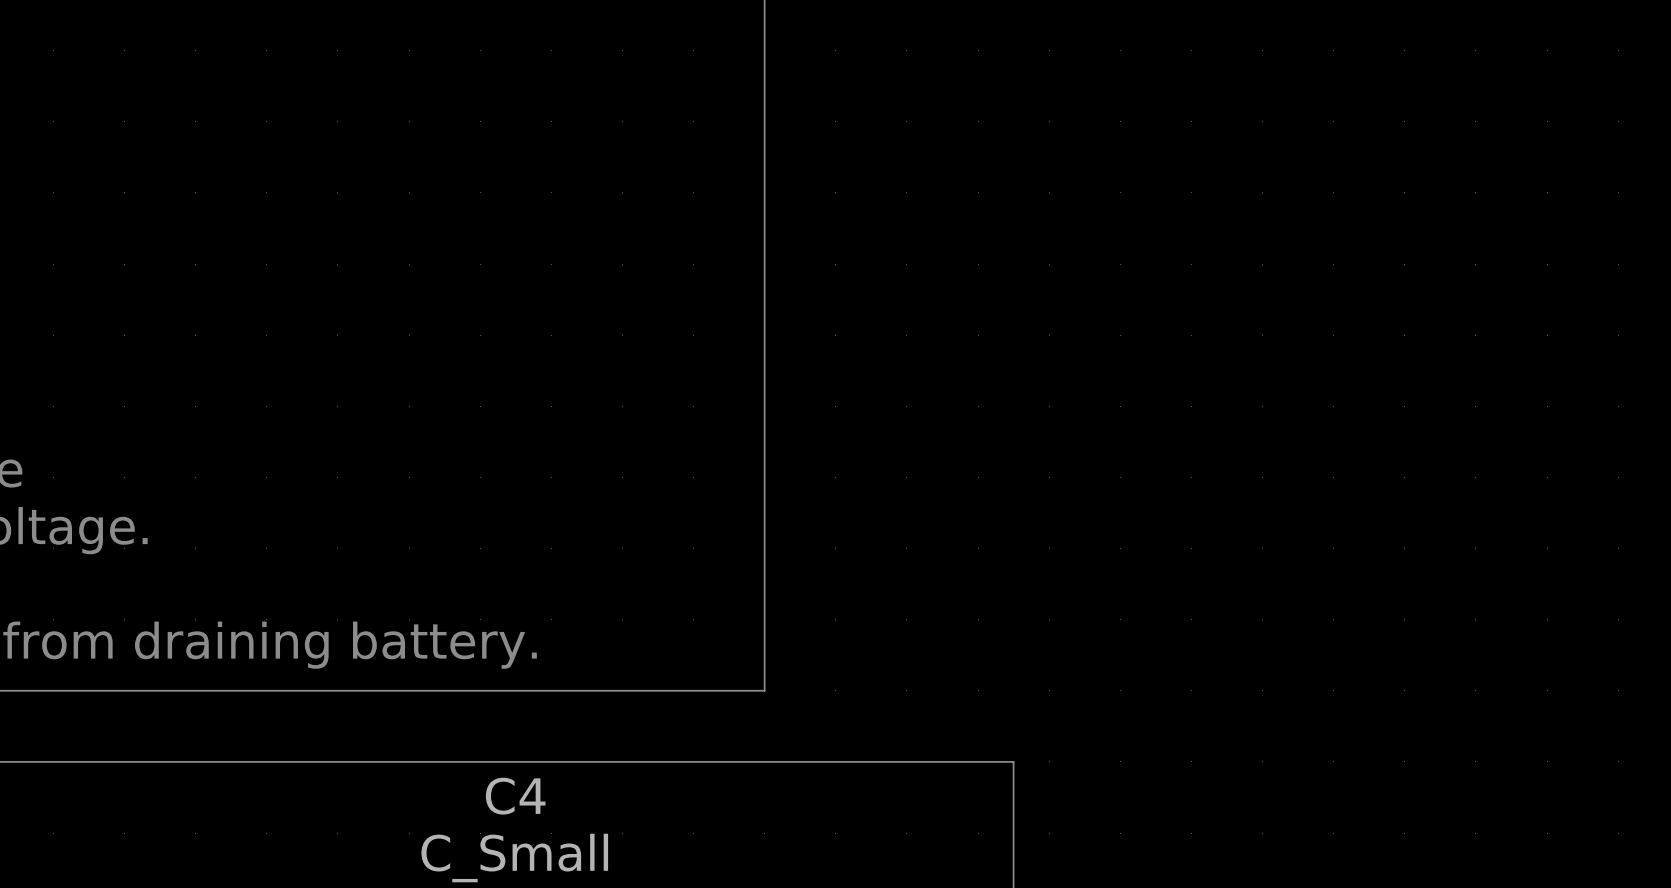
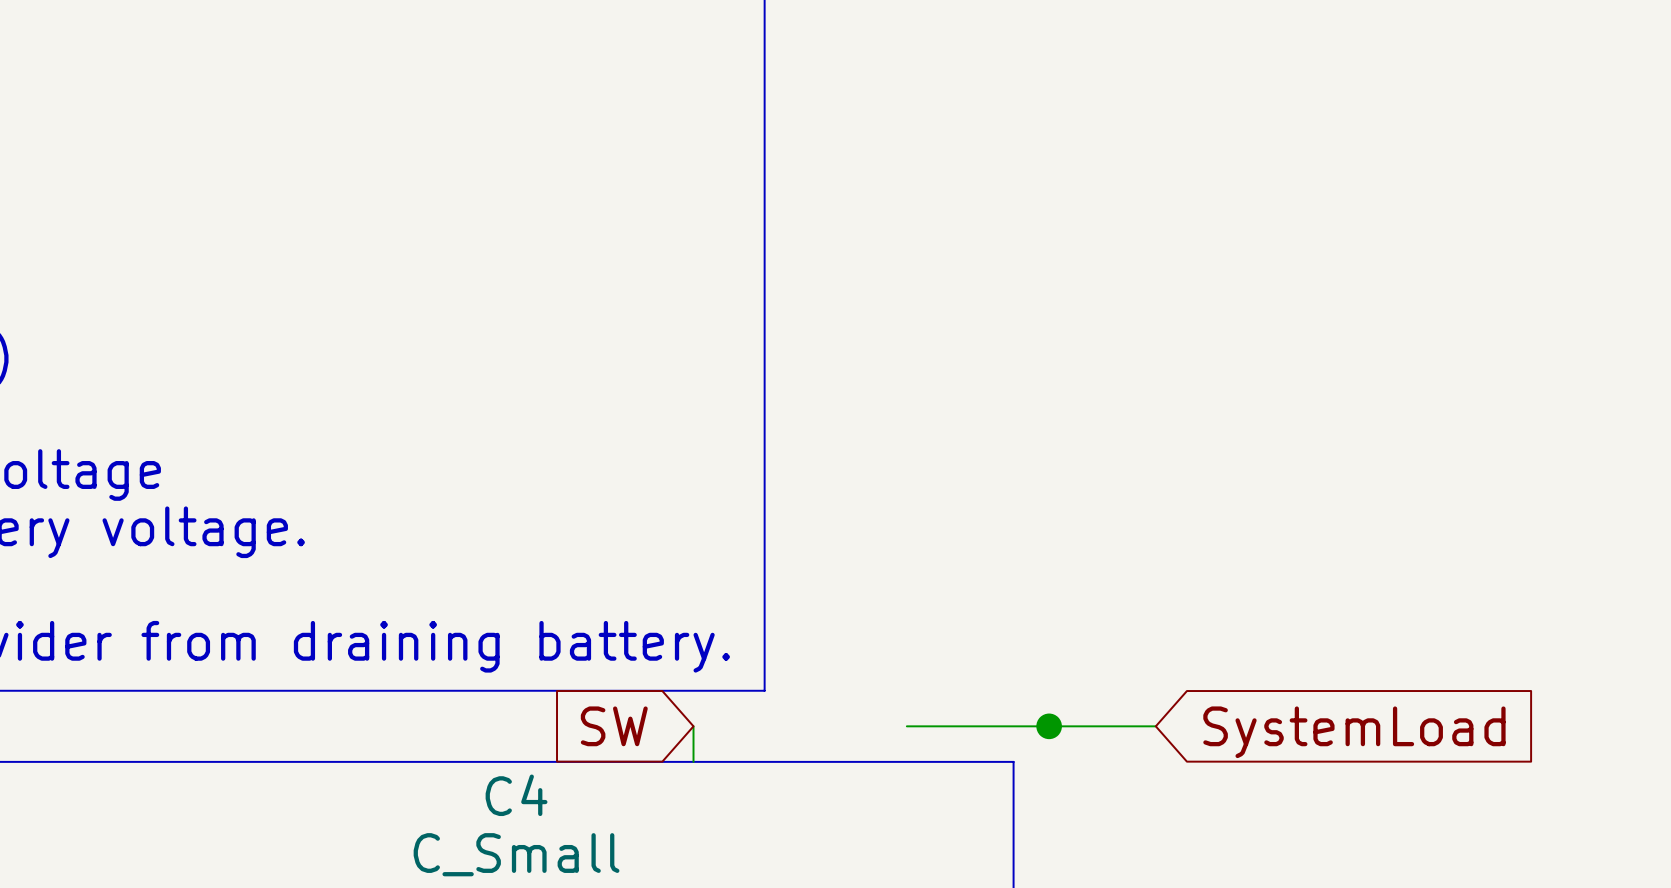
global label: none -> SW (614, 726)
wire: none -> (693, 726) (693, 761)
wire: none -> (906, 726) (1155, 726)
junction: none -> (1049, 726)
global label: none -> SystemLoad (1354, 732)

